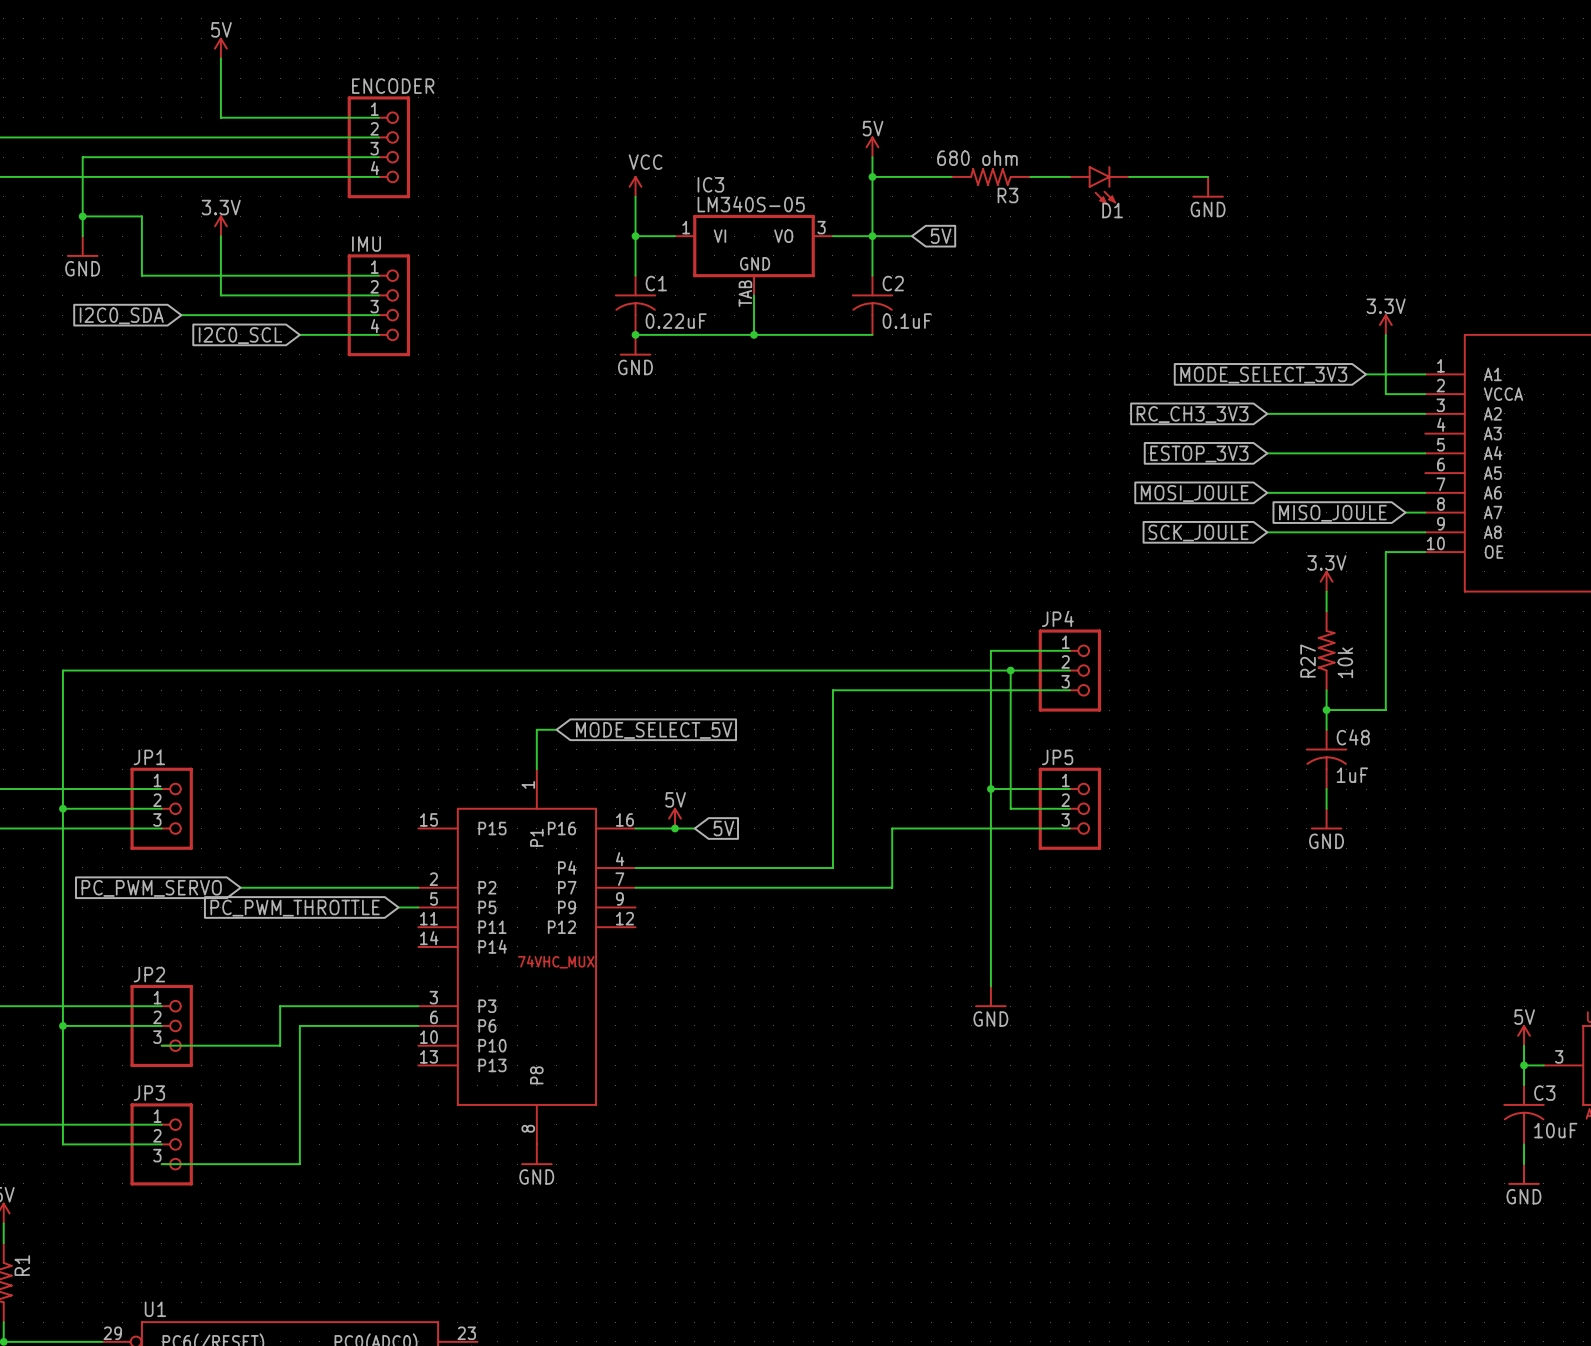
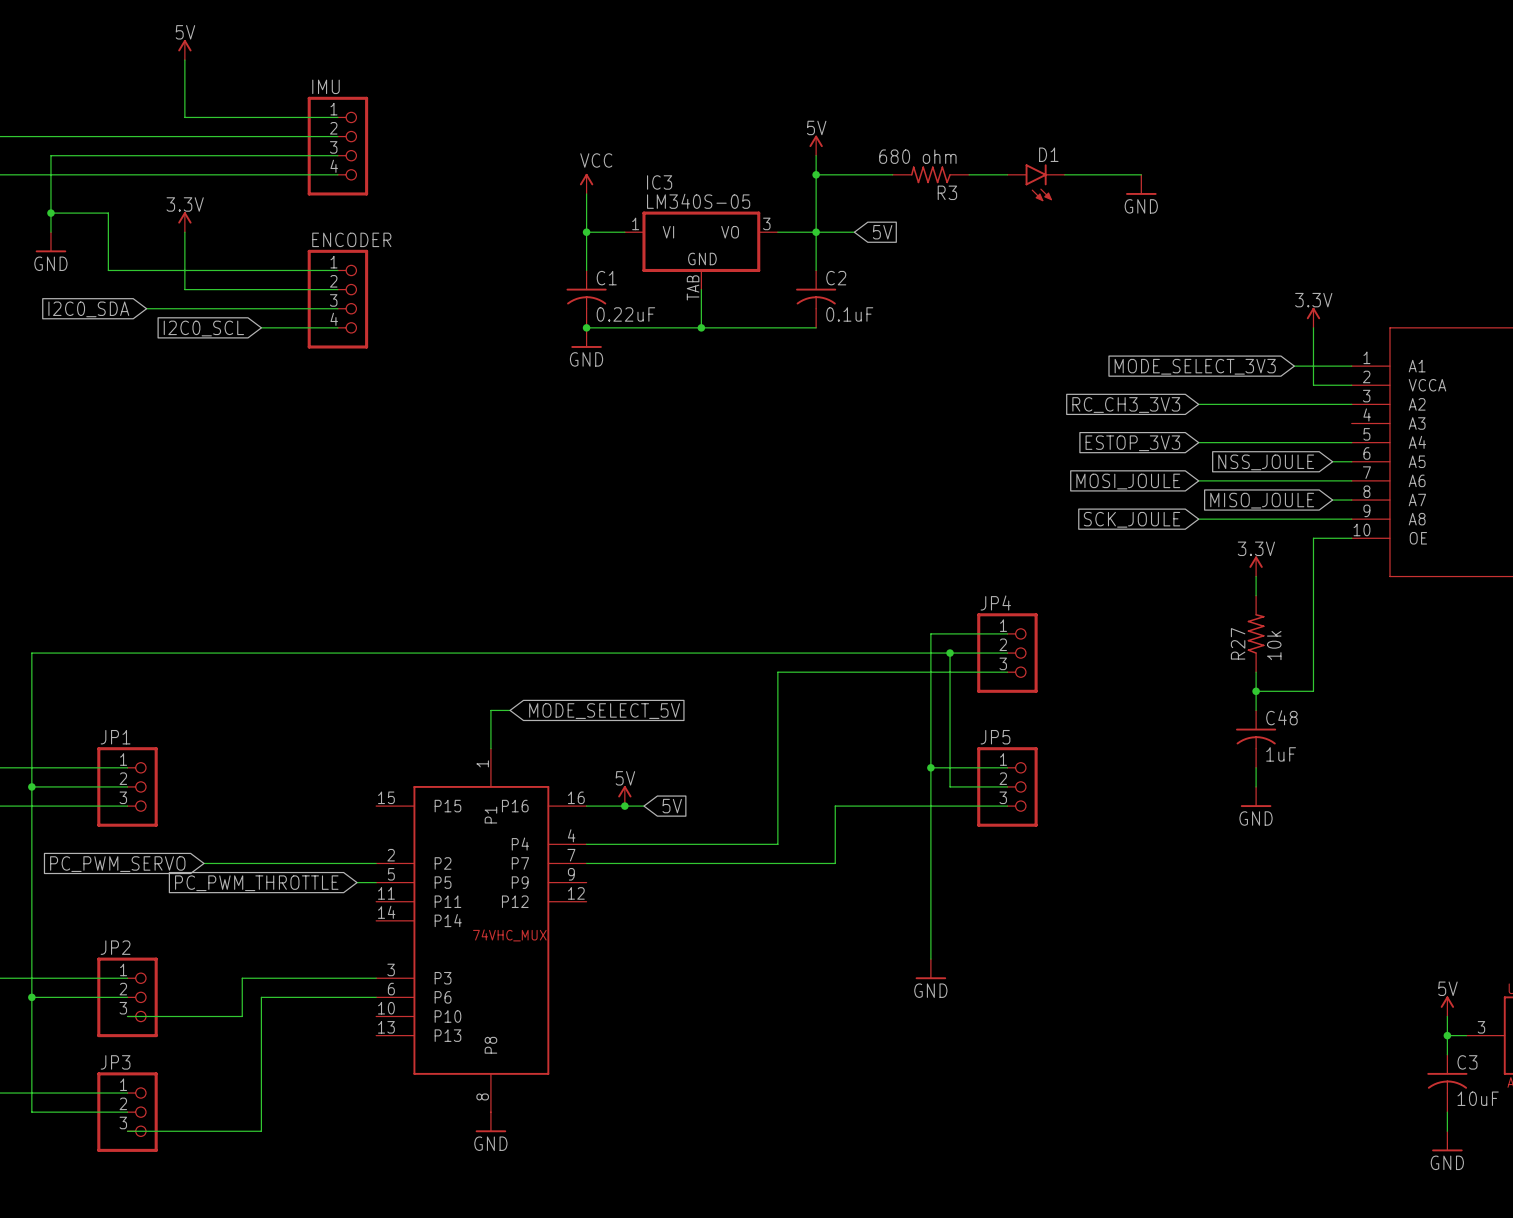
ENCODER name: ENCODER (393, 86) -> IMU (325, 86)
D1 name position: D1 (1112, 210) -> D1 (1048, 154)
IMU name: IMU (366, 244) -> ENCODER (351, 239)
global label: none -> NSS_JOULE (1266, 462)
wire: none -> (1332, 461) (1351, 461)

